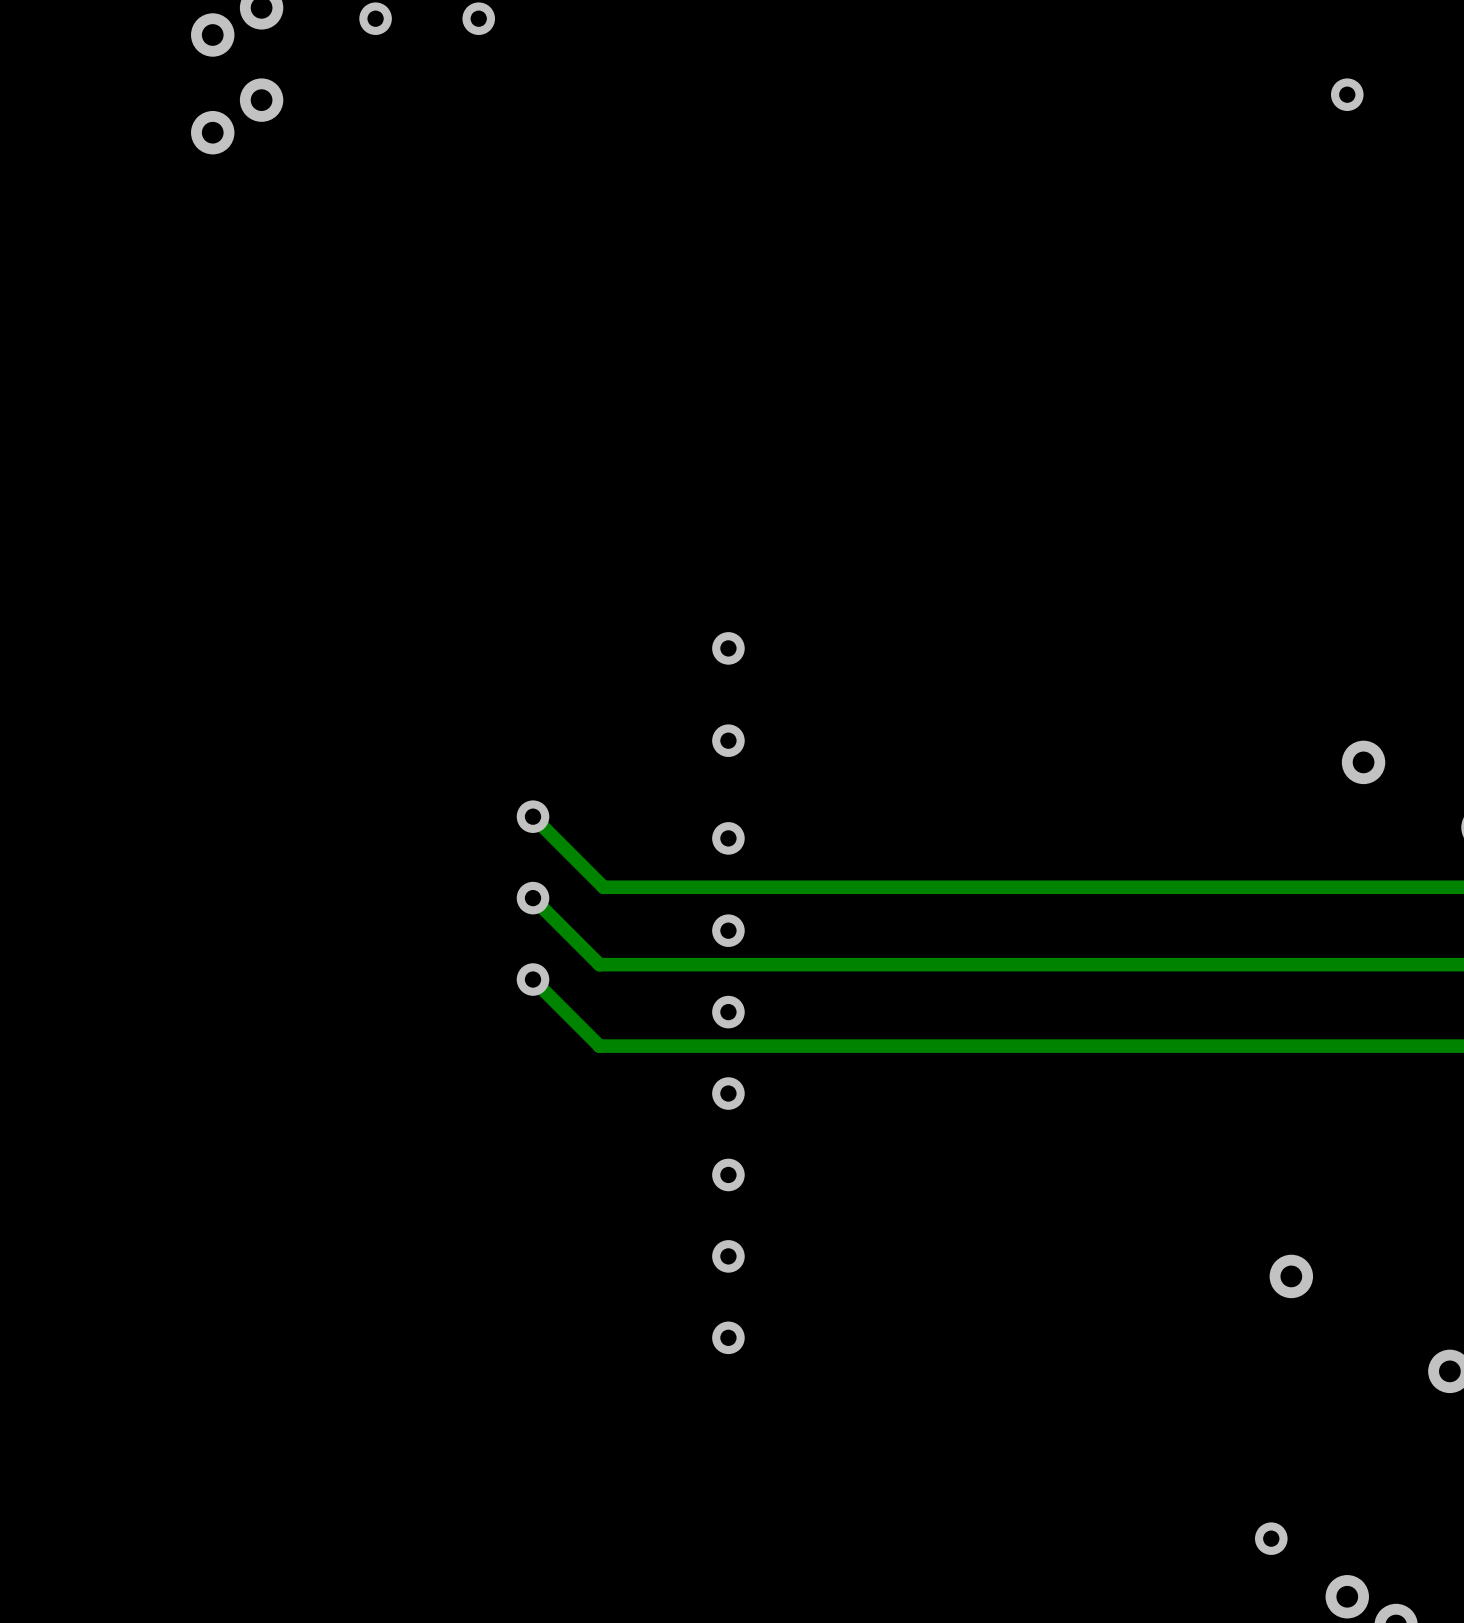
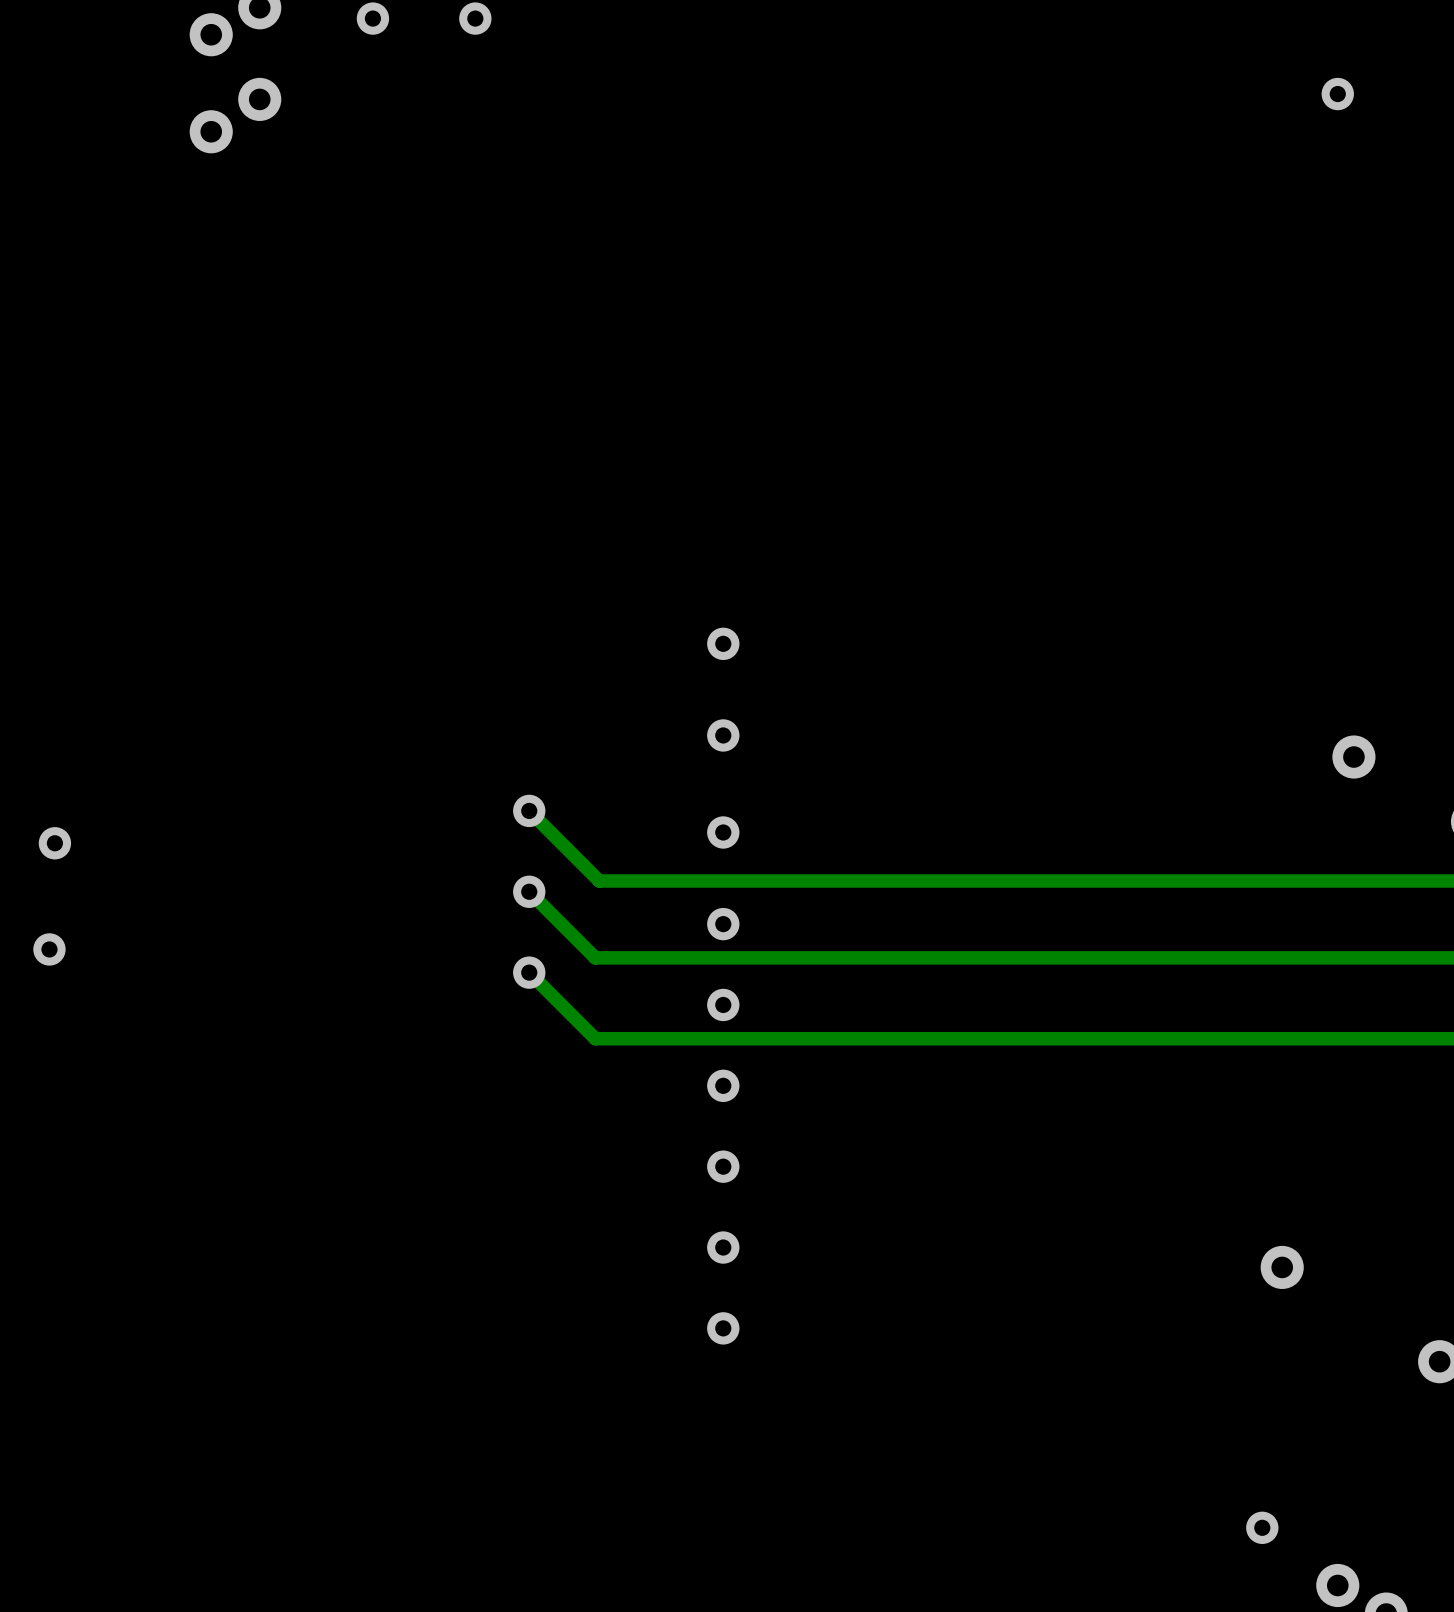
via: none -> (54, 843)
via: none -> (49, 949)

